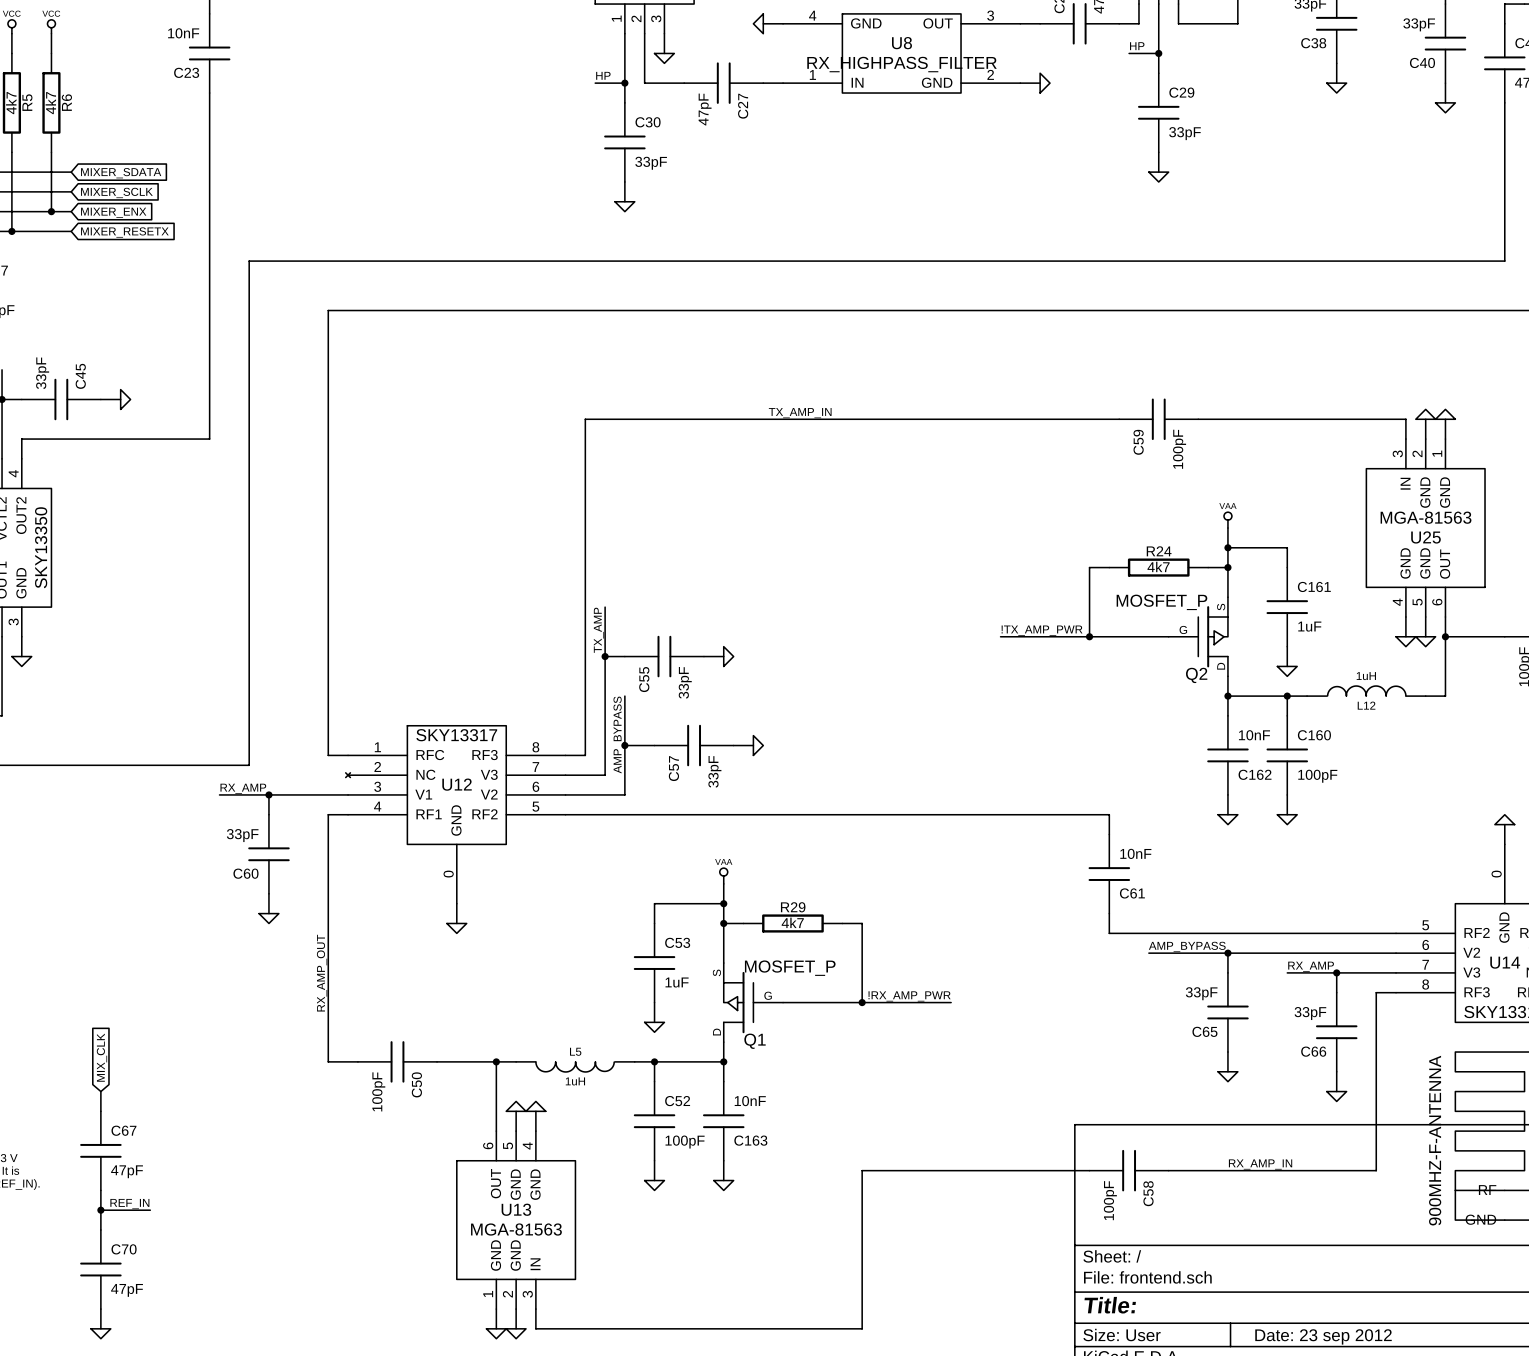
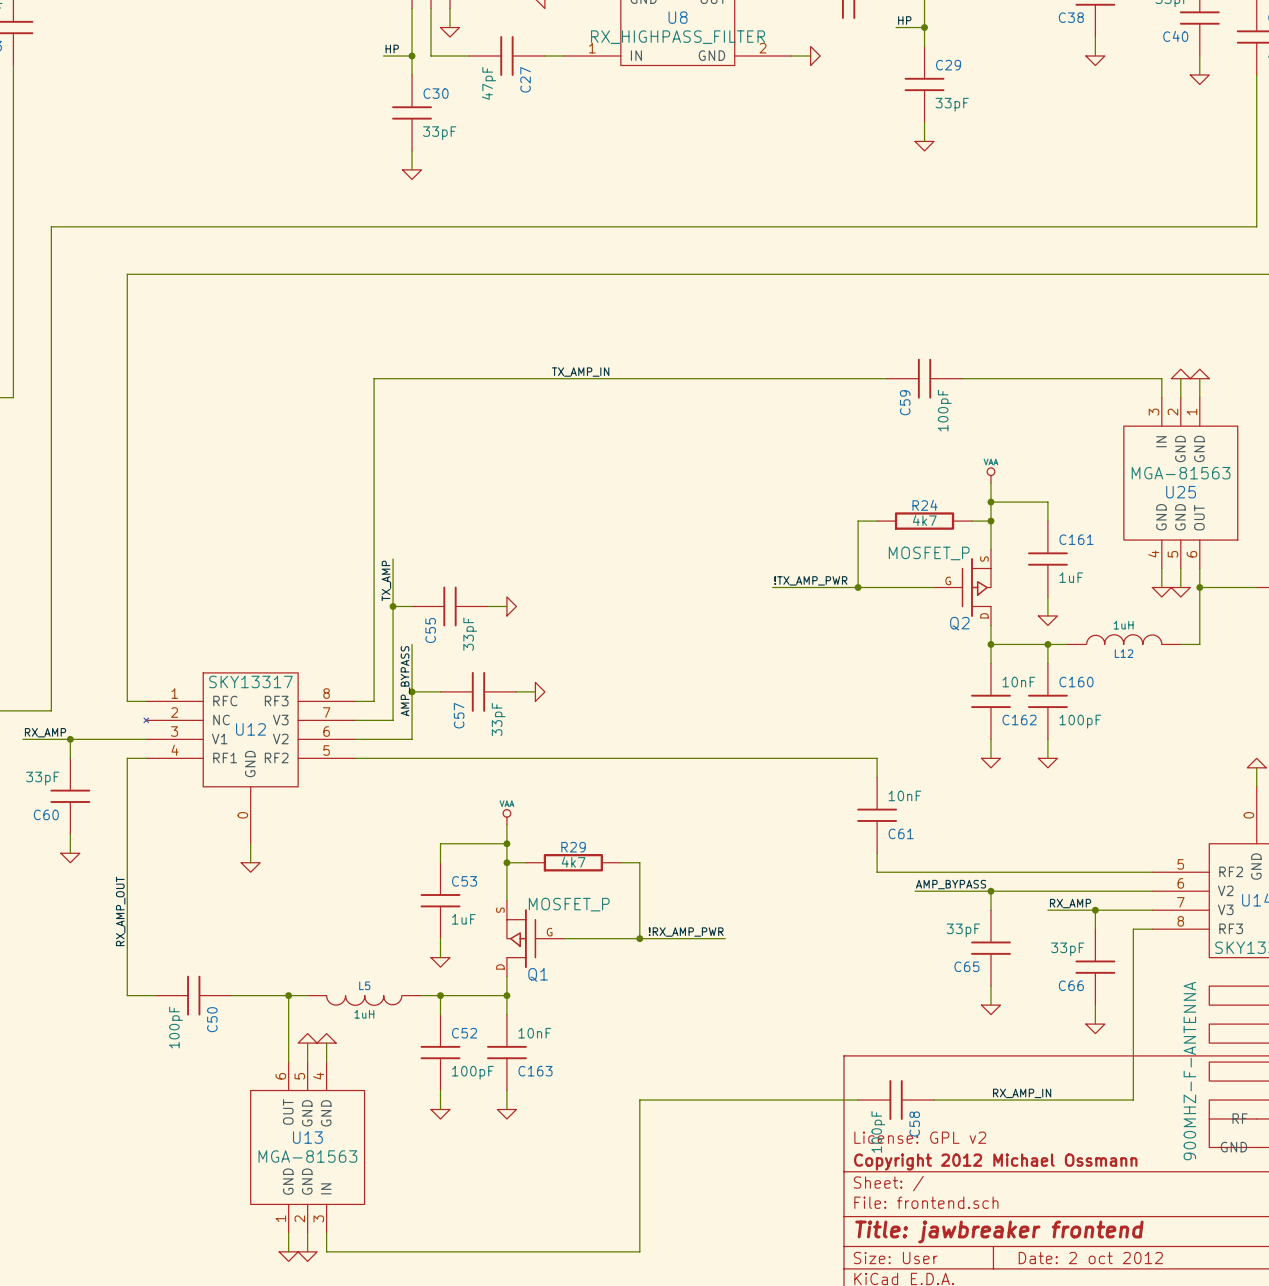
title block: none -> License: GPL v2 (920, 1137)
title block: none -> Copyright 2012 Michael Ossmann (995, 1162)
title block: Title: (1110, 1305) -> Title: jawbreaker frontend (999, 1231)
title block: Date: 23 sep 2012 (1323, 1336) -> Date: 2 oct 2012 (1090, 1258)

